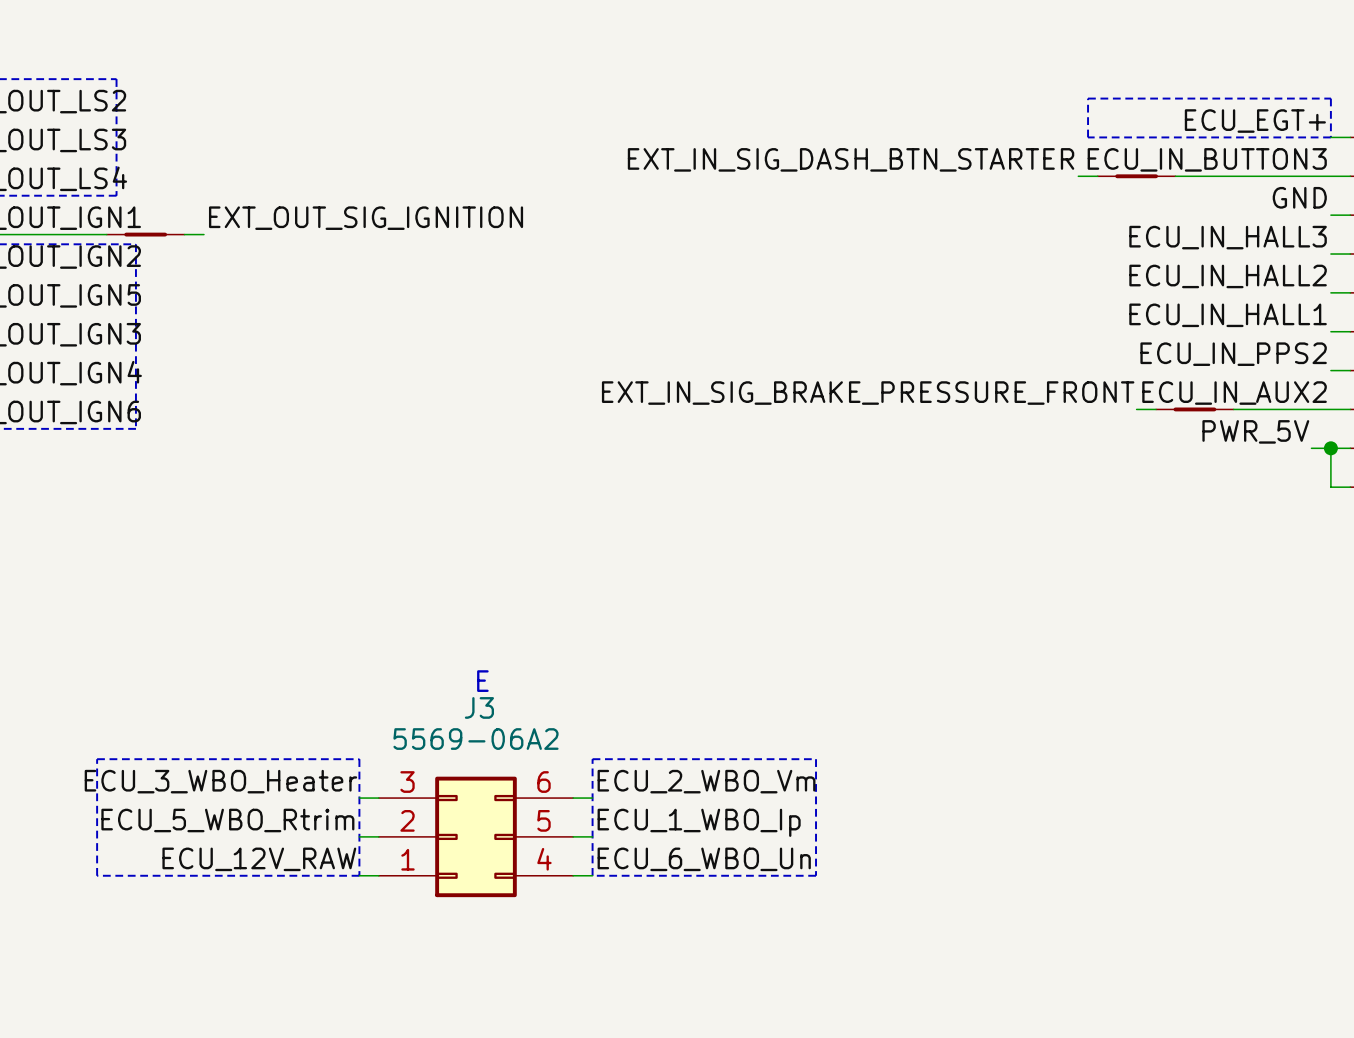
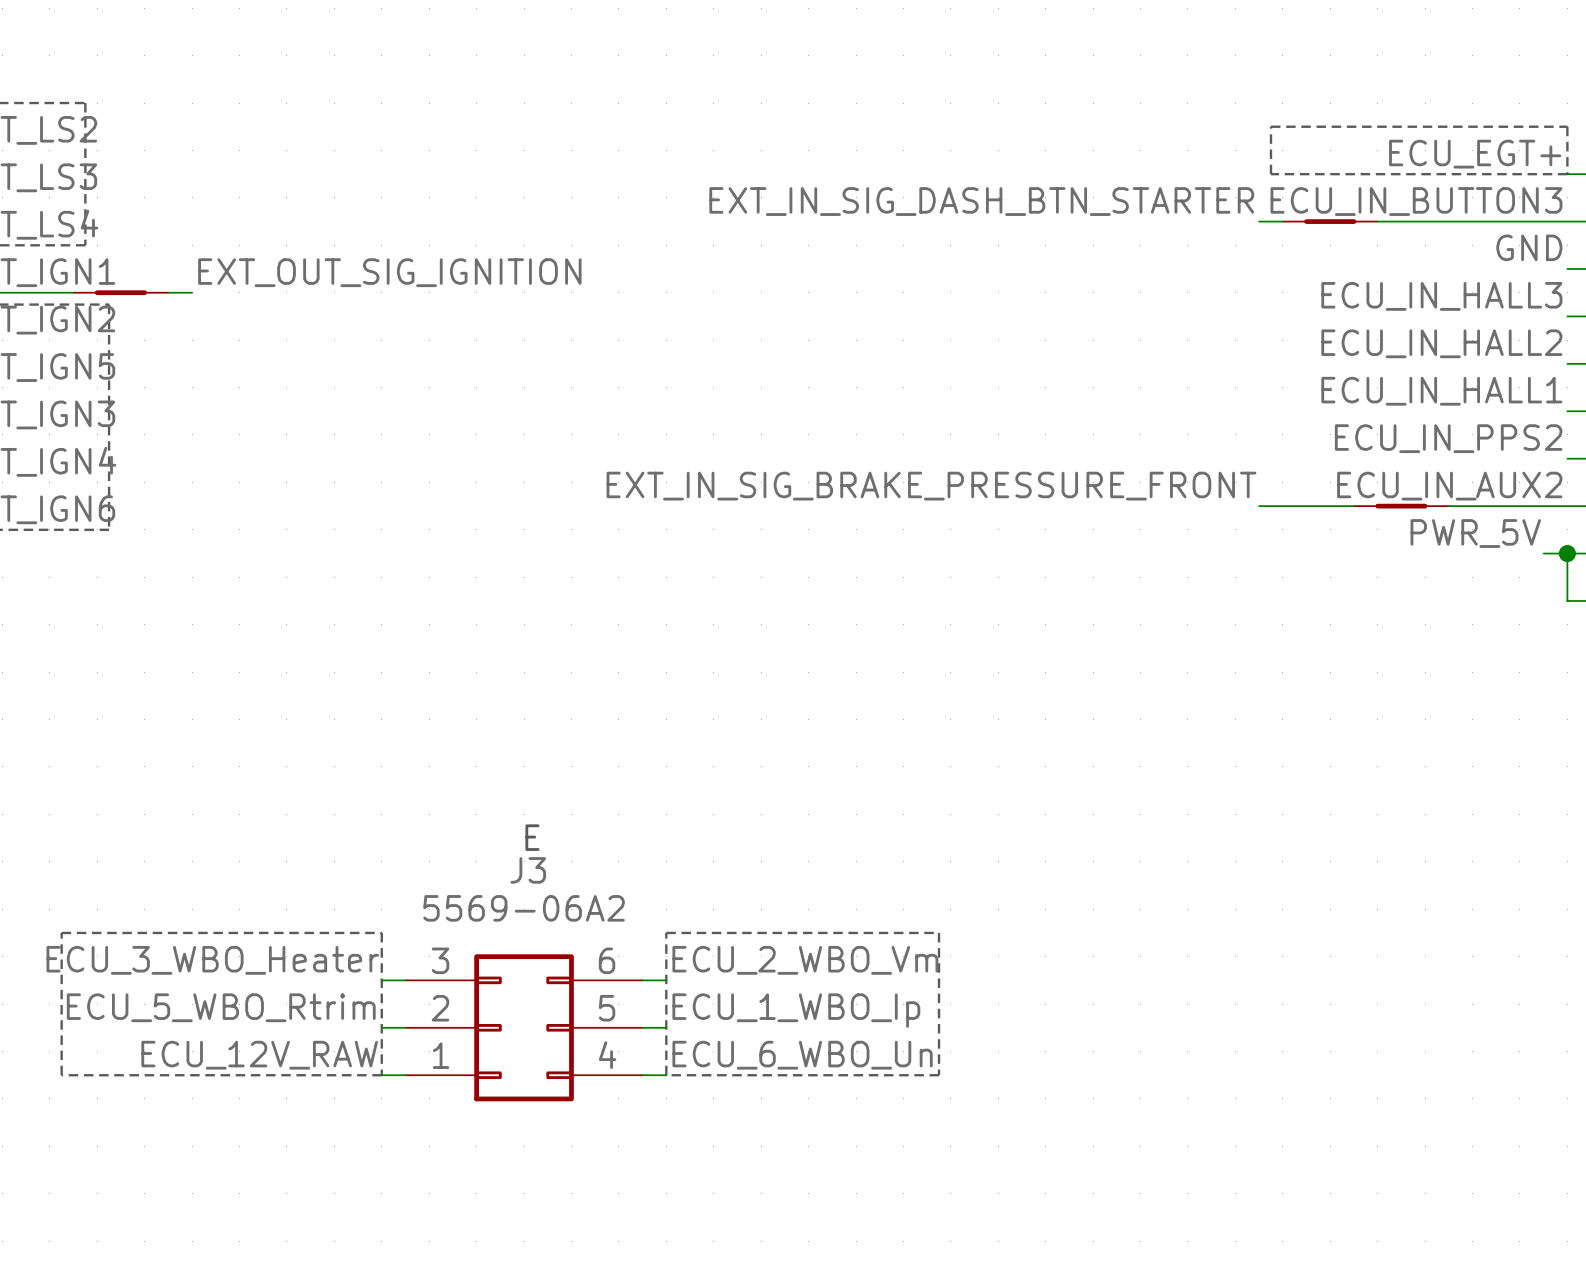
label position: EXT_IN_SIG_BRAKE_PRESSURE_FRONT (868, 393) -> EXT_IN_SIG_BRAKE_PRESSURE_FRONT (931, 486)
wire: none -> (1259, 506) (1330, 506)

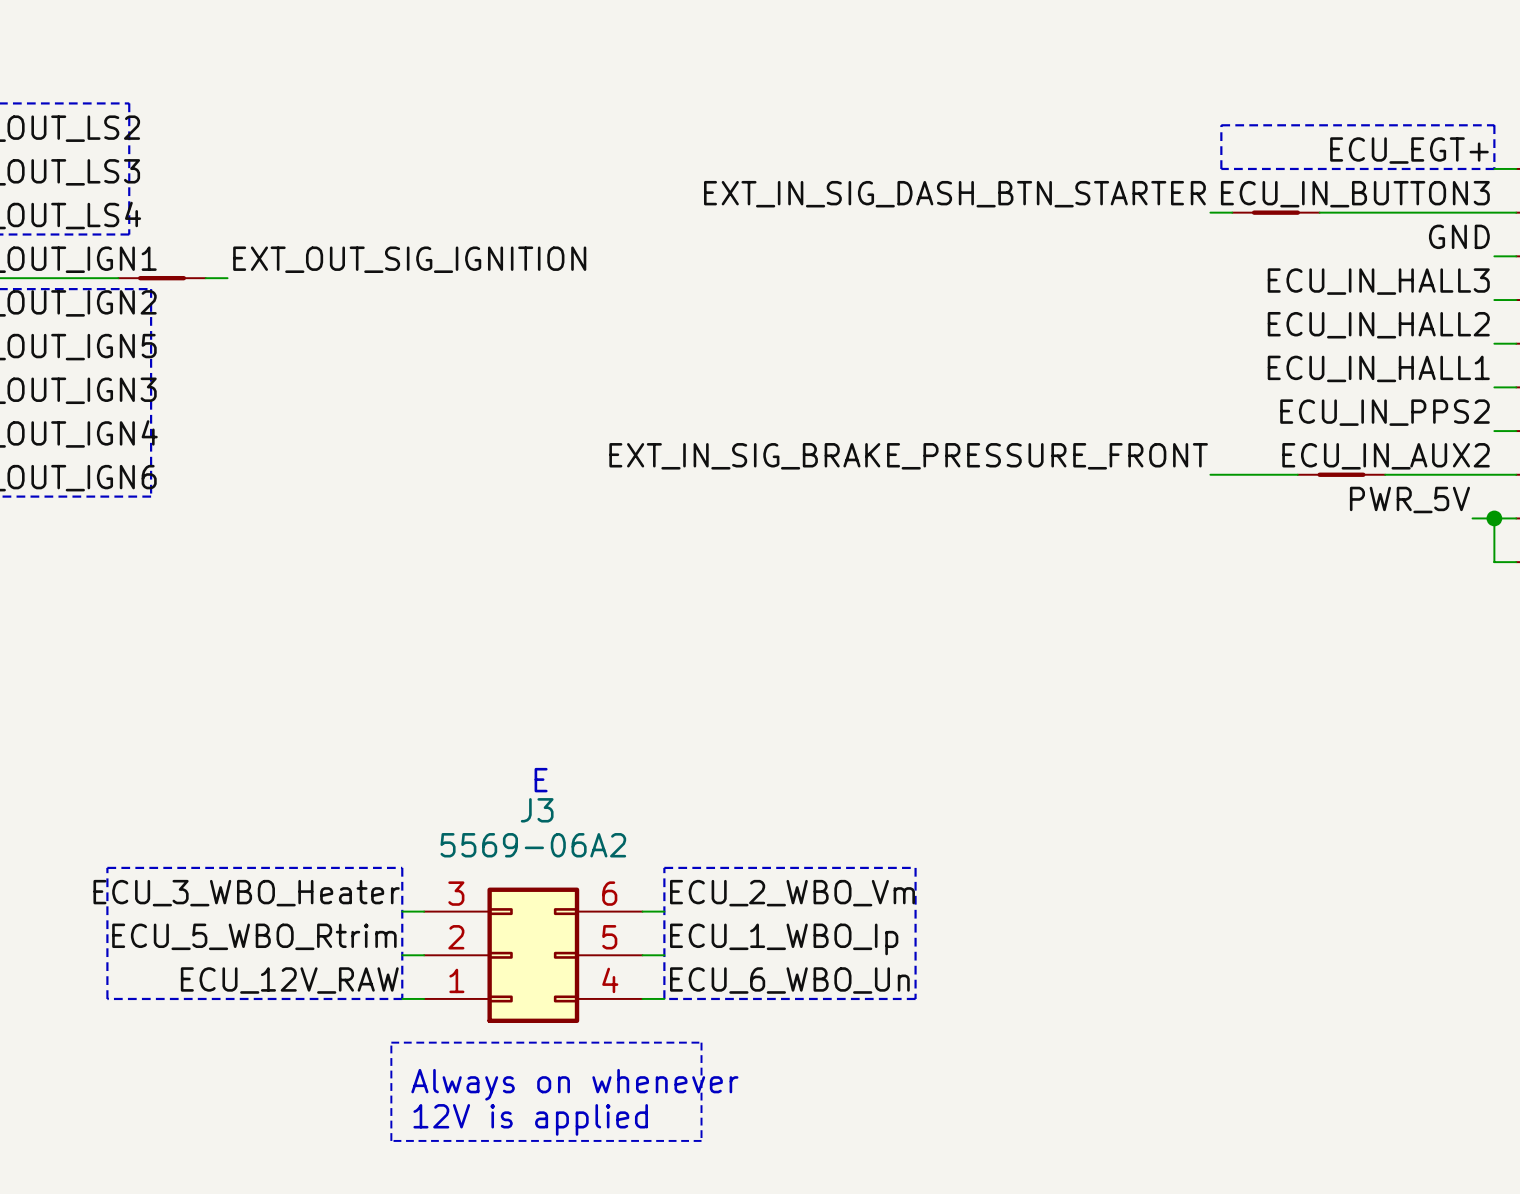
line: none -> (391, 1042) (701, 1042) (701, 1140) (391, 1140) (391, 1042)
text: none -> Always on whenever (574, 1084)
text: none -> 12V is applied (530, 1119)

